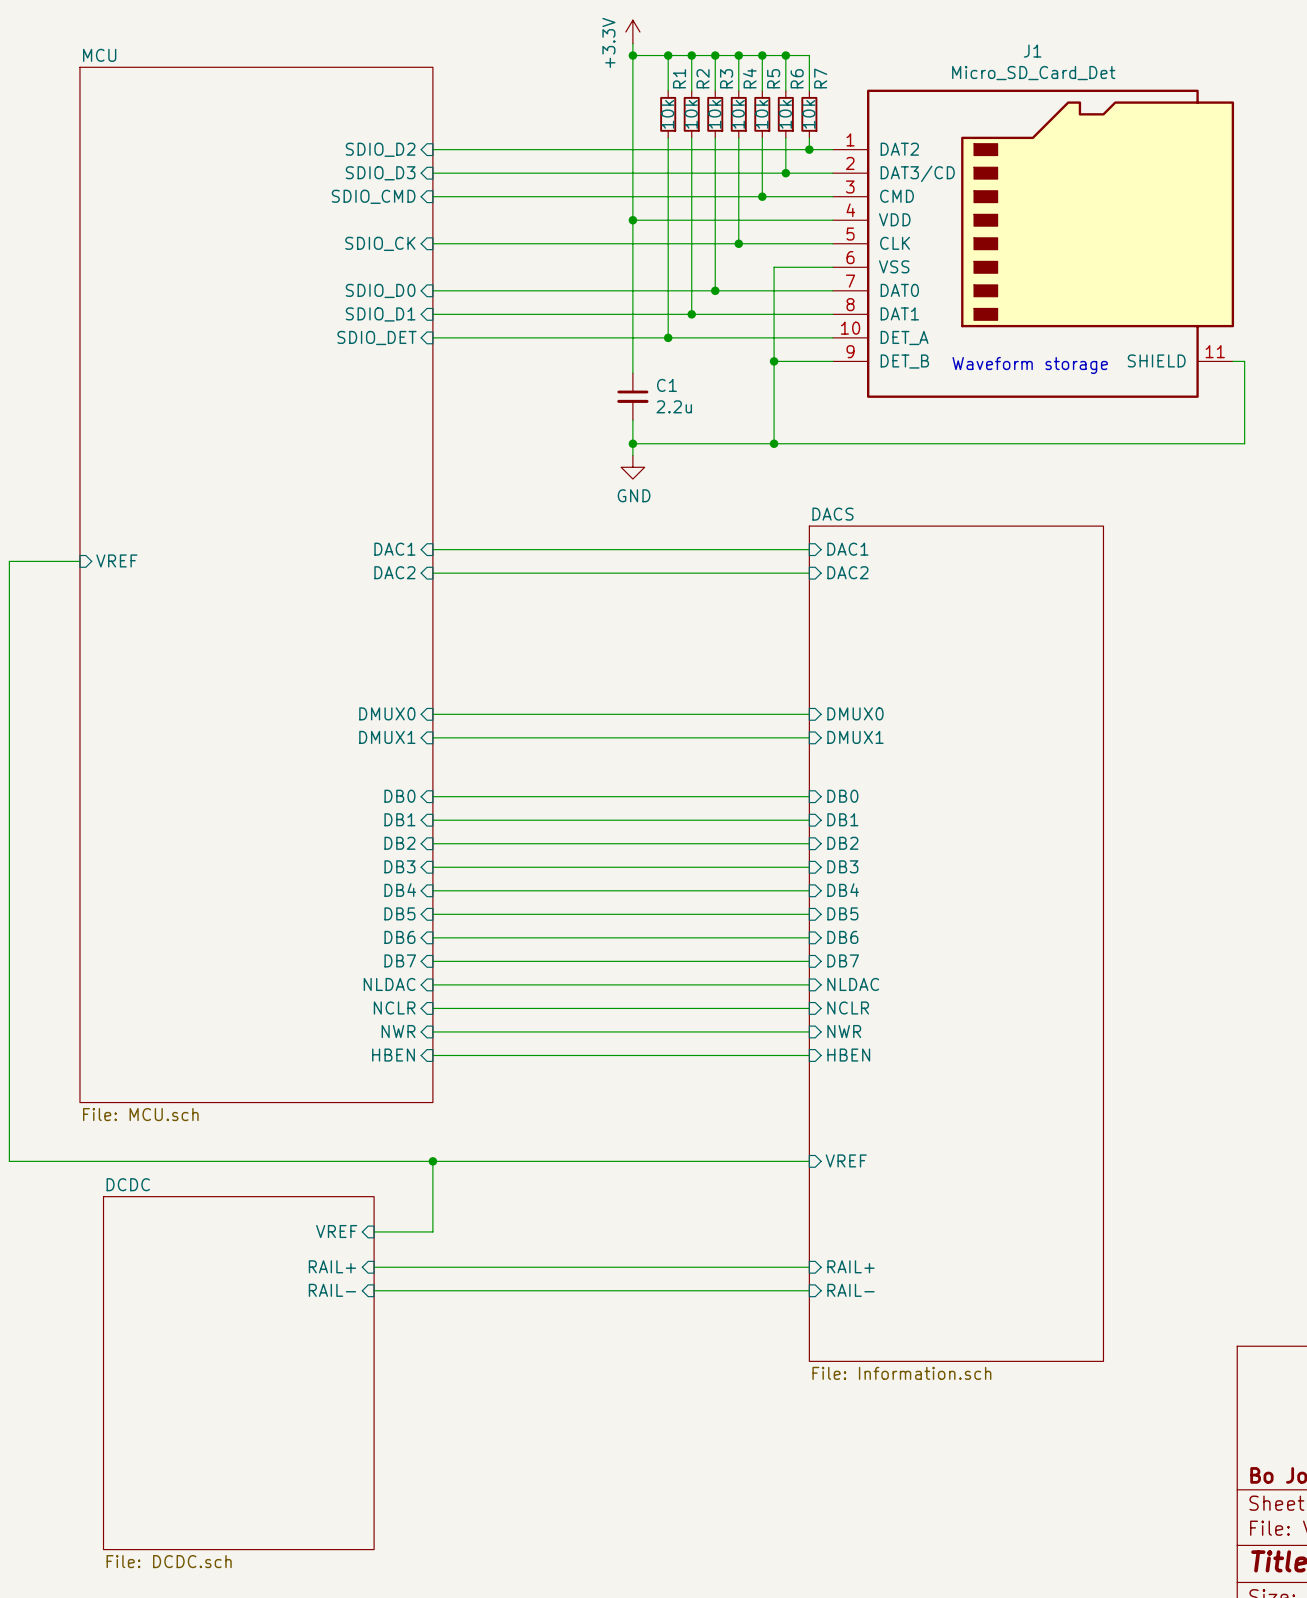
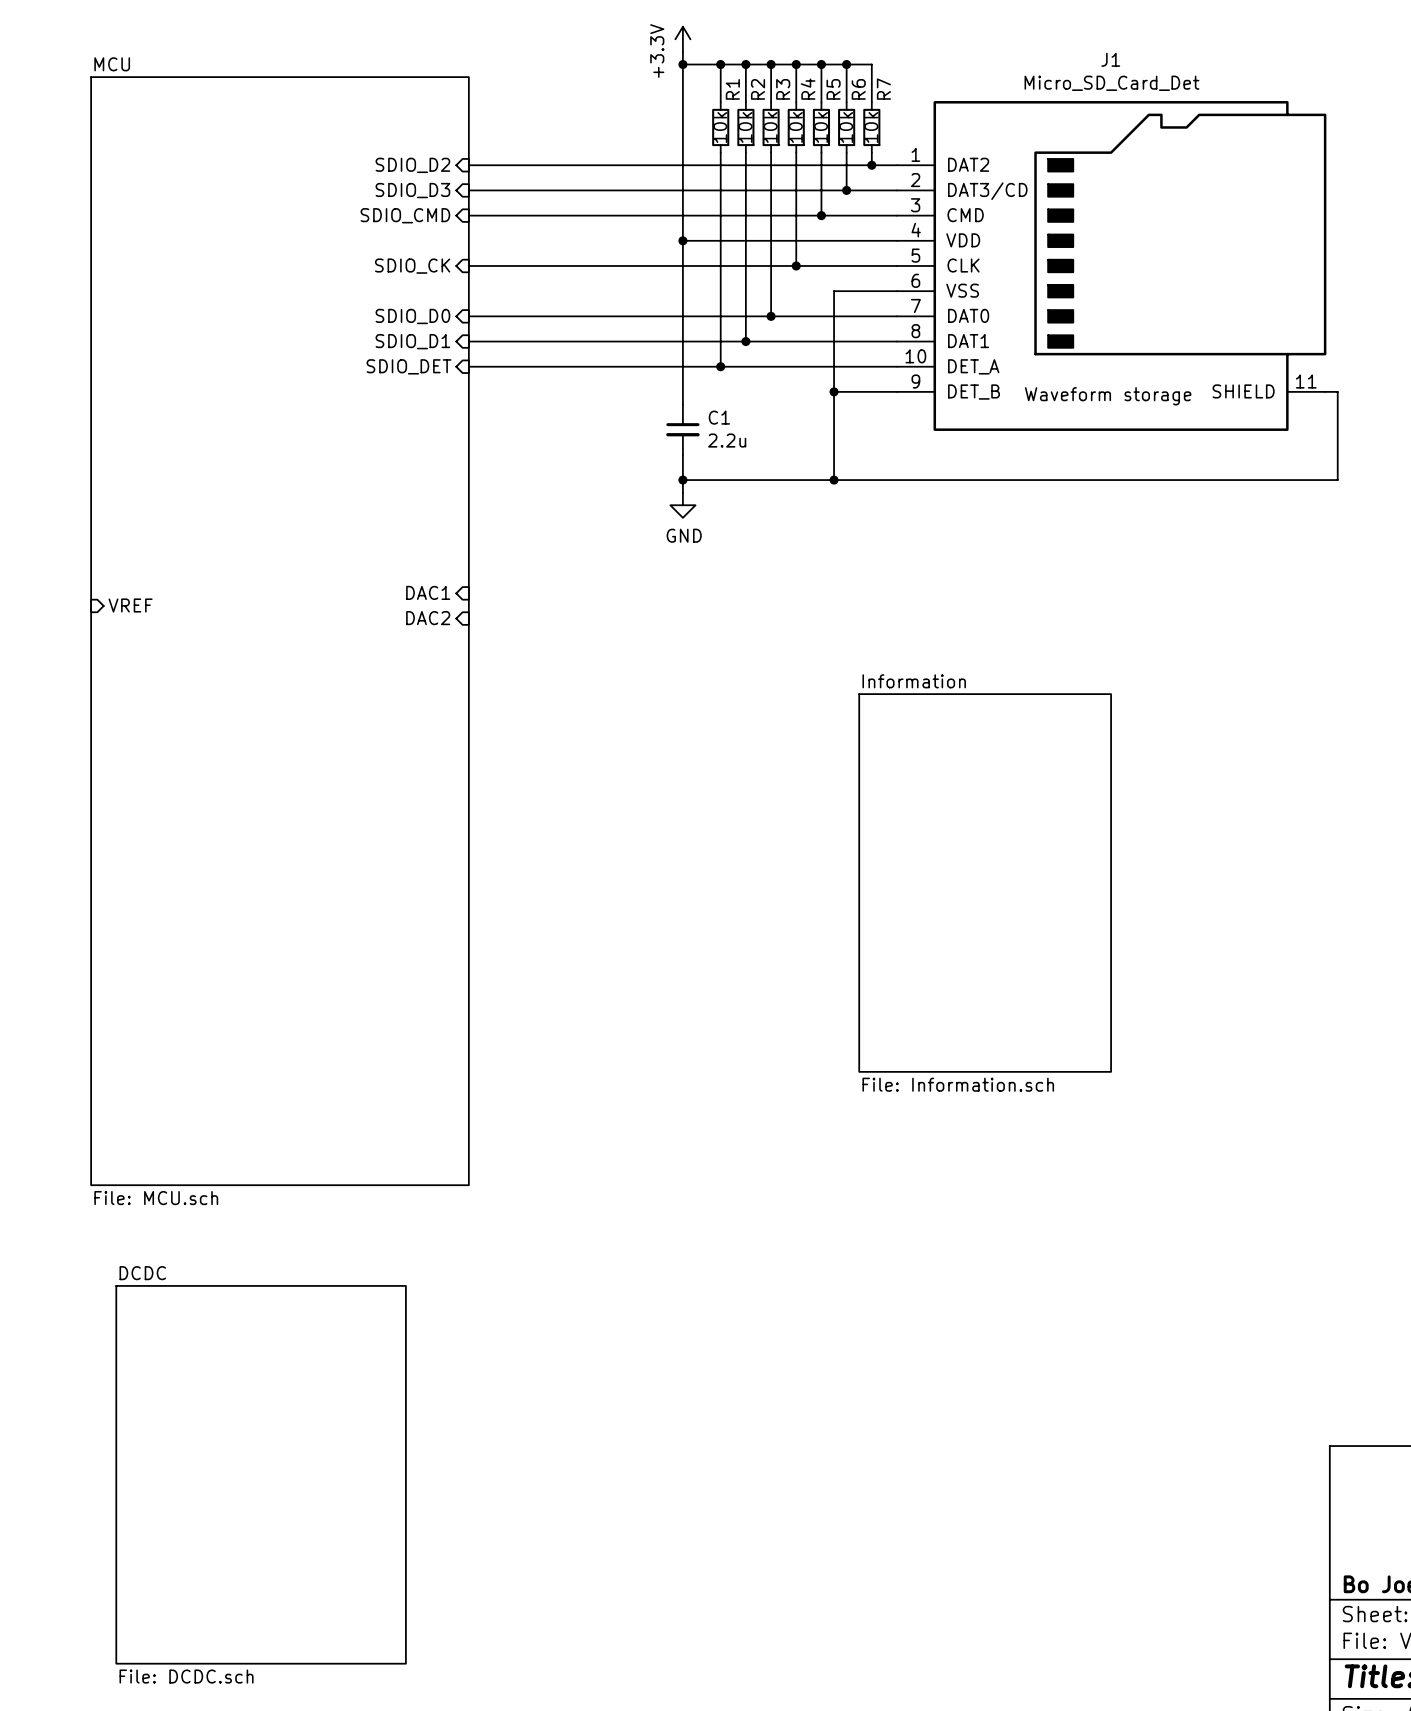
wire: (432, 549) (809, 549) -> none
sheet pin: DAC1 (847, 549) -> none
wire: (79, 561) (9, 561) (9, 1161) (809, 1161) -> none
sheet pin: DAC2 (847, 572) -> none
wire: (432, 573) (809, 573) -> none
sheet pin: DMUX0 (387, 713) -> none
sheet pin: DMUX0 (855, 713) -> none
wire: (432, 714) (809, 714) -> none
sheet pin: DMUX1 (387, 737) -> none
wire: (432, 737) (809, 737) -> none
sheet pin: DMUX1 (855, 737) -> none
sheet pin: DB0 (399, 796) -> none
wire: (432, 796) (809, 796) -> none
sheet pin: DB0 (842, 796) -> none
sheet pin: DB1 (399, 819) -> none
sheet pin: DB1 (842, 819) -> none
wire: (432, 820) (809, 820) -> none
sheet Information: none -> File: Information.sch (985, 883)
sheet pin: DB2 (399, 843) -> none
wire: (432, 843) (809, 843) -> none
sheet pin: DB2 (842, 843) -> none
sheet pin: DB3 (399, 866) -> none
sheet pin: DB3 (842, 866) -> none
wire: (432, 867) (809, 867) -> none
sheet pin: DB4 (400, 890) -> none
wire: (432, 890) (809, 890) -> none
sheet pin: DB4 (843, 890) -> none
sheet pin: DB5 (399, 913) -> none
sheet pin: DB5 (842, 913) -> none
wire: (432, 914) (809, 914) -> none
sheet pin: DB6 (399, 937) -> none
wire: (432, 937) (809, 937) -> none
sheet pin: DB6 (842, 937) -> none
sheet DACS: File: Information.sch (956, 943) -> none
sheet pin: DB7 (400, 960) -> none
sheet pin: DB7 (843, 960) -> none
wire: (432, 961) (809, 961) -> none
sheet pin: NLDAC (389, 984) -> none
wire: (432, 984) (809, 984) -> none
sheet pin: NLDAC (853, 984) -> none
sheet pin: NCLR (394, 1007) -> none
sheet pin: NCLR (848, 1007) -> none
wire: (432, 1008) (809, 1008) -> none
sheet pin: NWR (398, 1031) -> none
wire: (432, 1031) (809, 1031) -> none
sheet pin: NWR (844, 1031) -> none
sheet pin: HBEN (393, 1055) -> none
wire: (432, 1055) (809, 1055) -> none
sheet pin: HBEN (848, 1055) -> none
sheet pin: VREF (846, 1160) -> none
wire: (432, 1161) (432, 1231) (374, 1231) -> none
junction: (432, 1161) -> none
sheet pin: VREF (336, 1231) -> none
sheet pin: RAIL+ (332, 1266) -> none
sheet pin: RAIL+ (851, 1266) -> none
wire: (374, 1267) (809, 1267) -> none
sheet pin: RAIL- (332, 1290) -> none
wire: (374, 1290) (809, 1290) -> none
sheet pin: RAIL- (851, 1290) -> none

